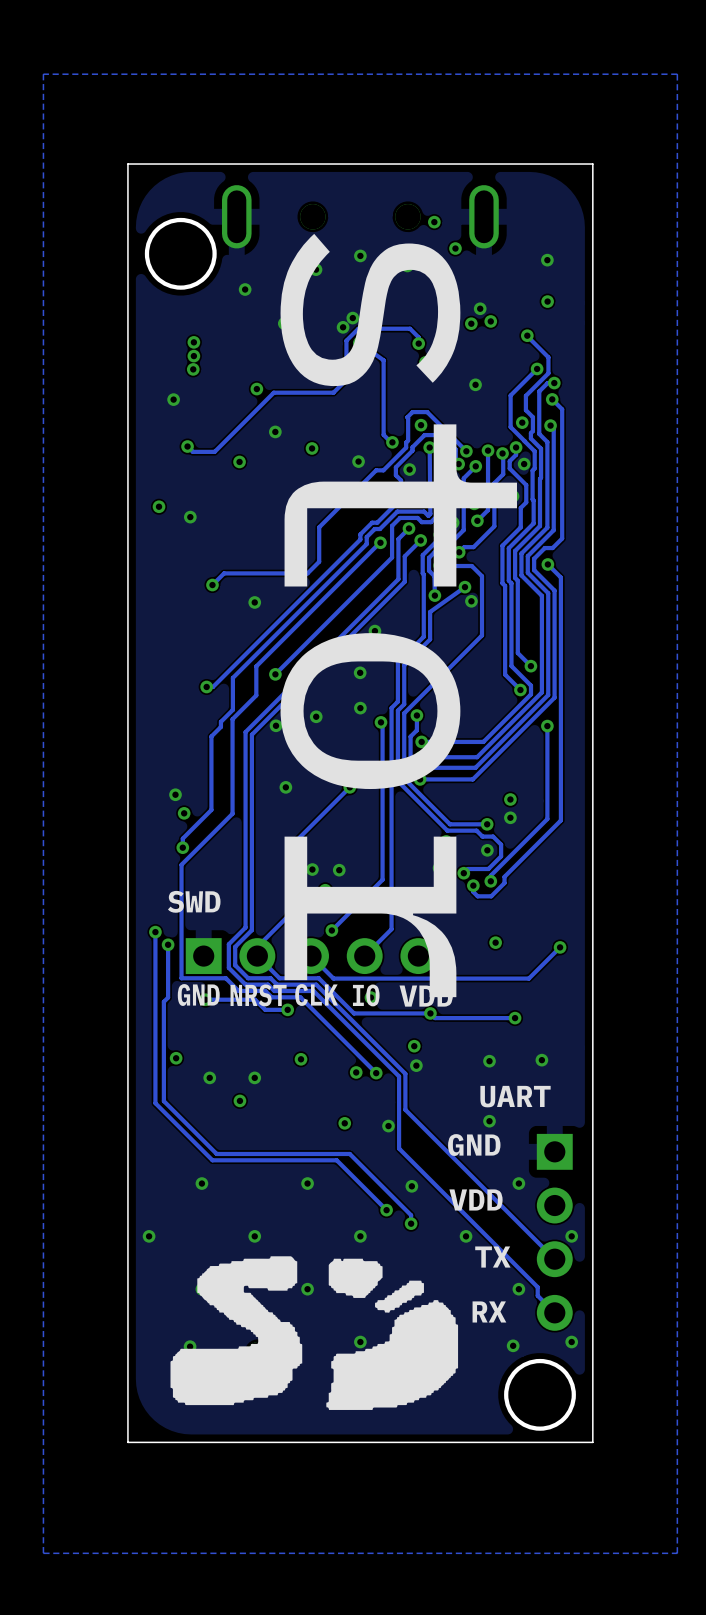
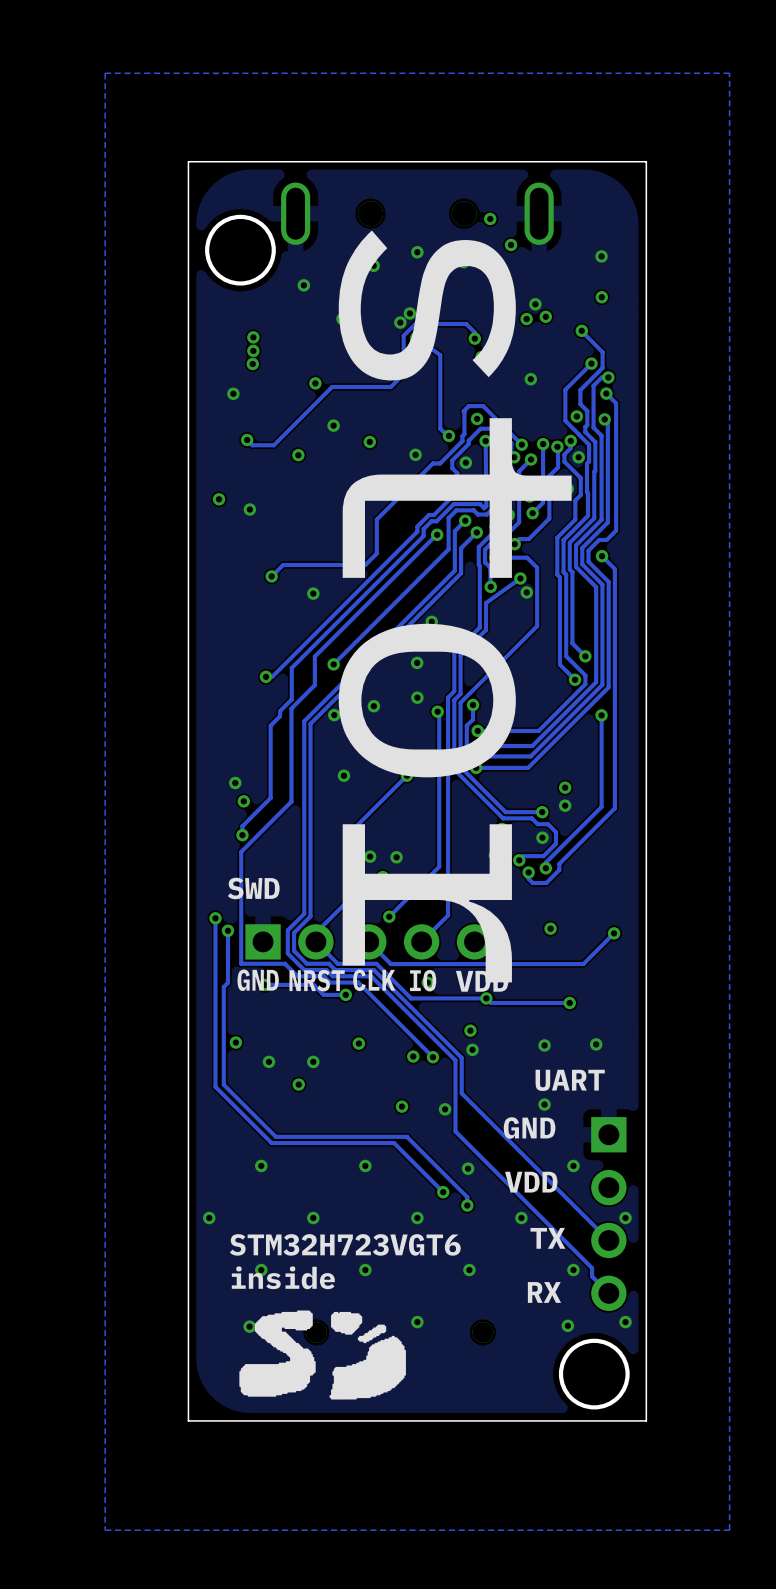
drawing: [170, 1256, 459, 1411] -> none
text: none -> STM32H723VGT6 (345, 1244)
text: none -> inside (283, 1277)
drawing: none -> [239, 1310, 406, 1400]

